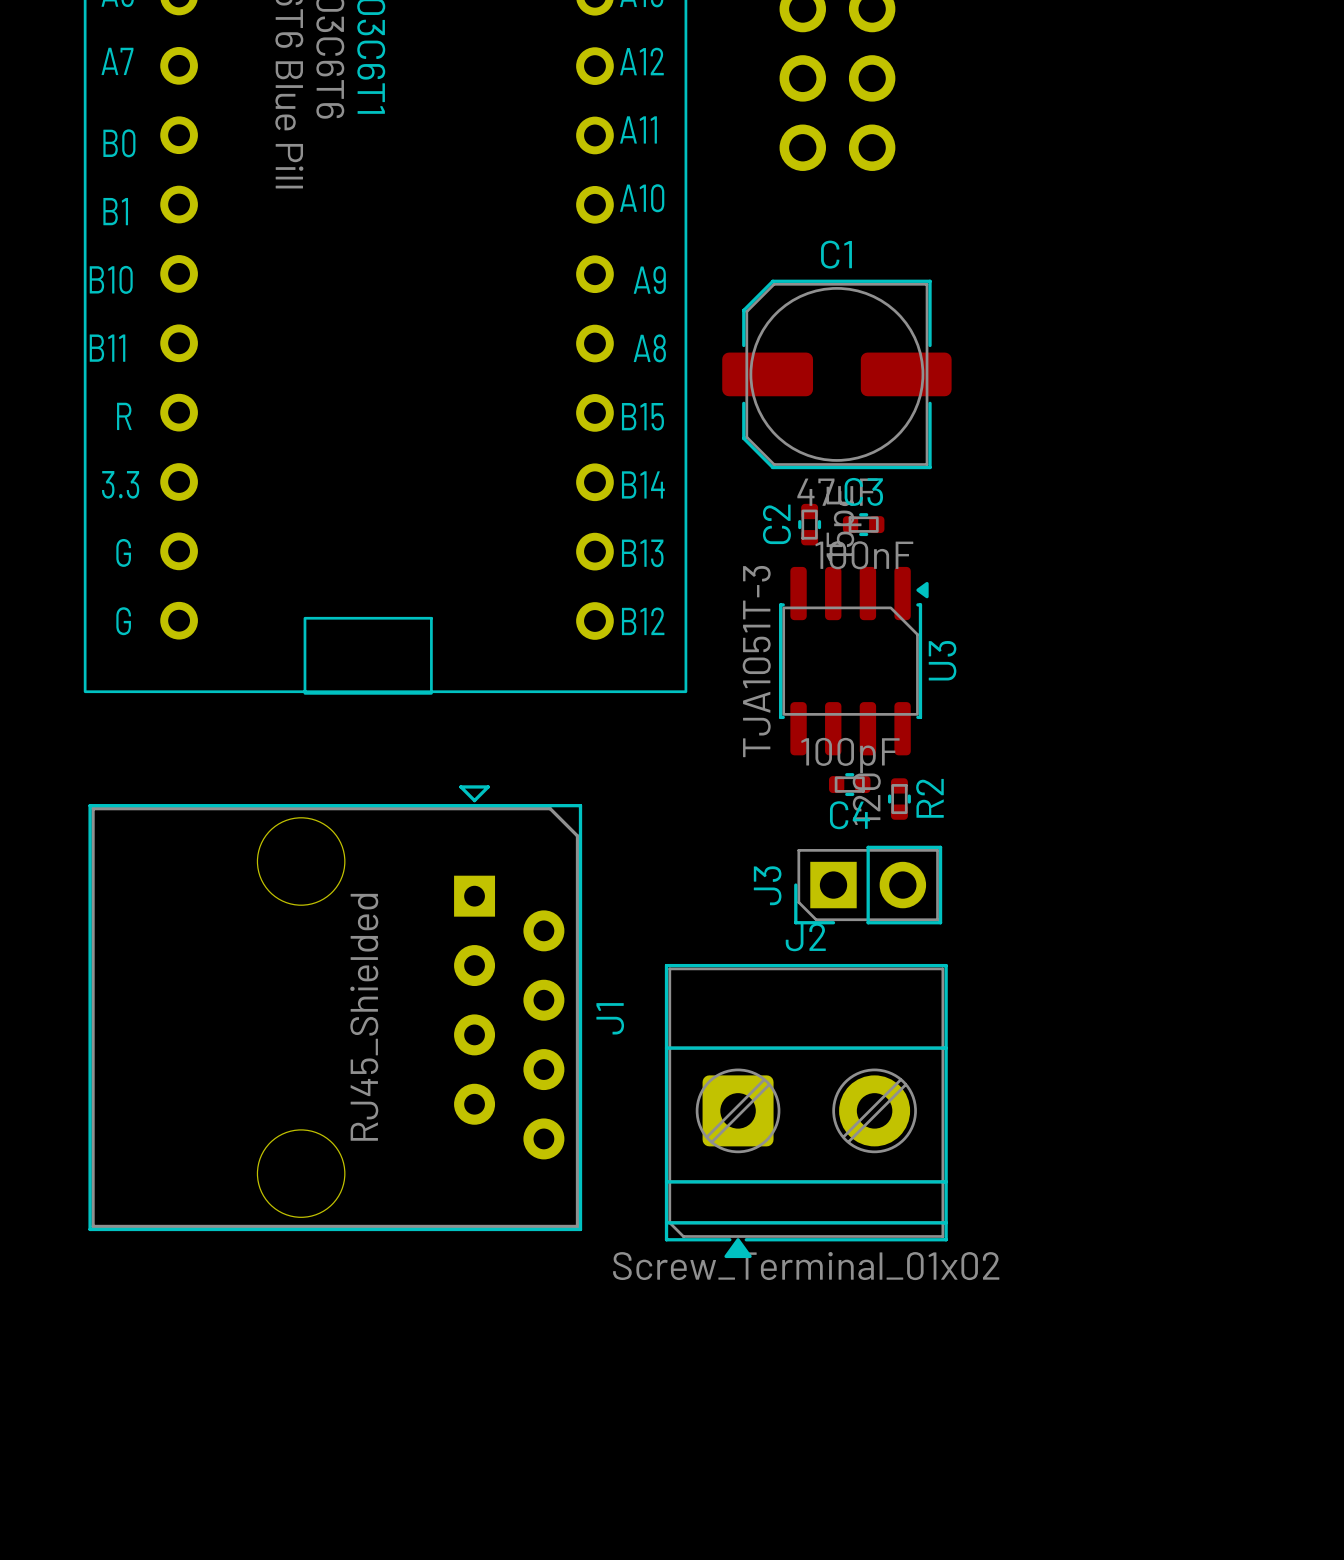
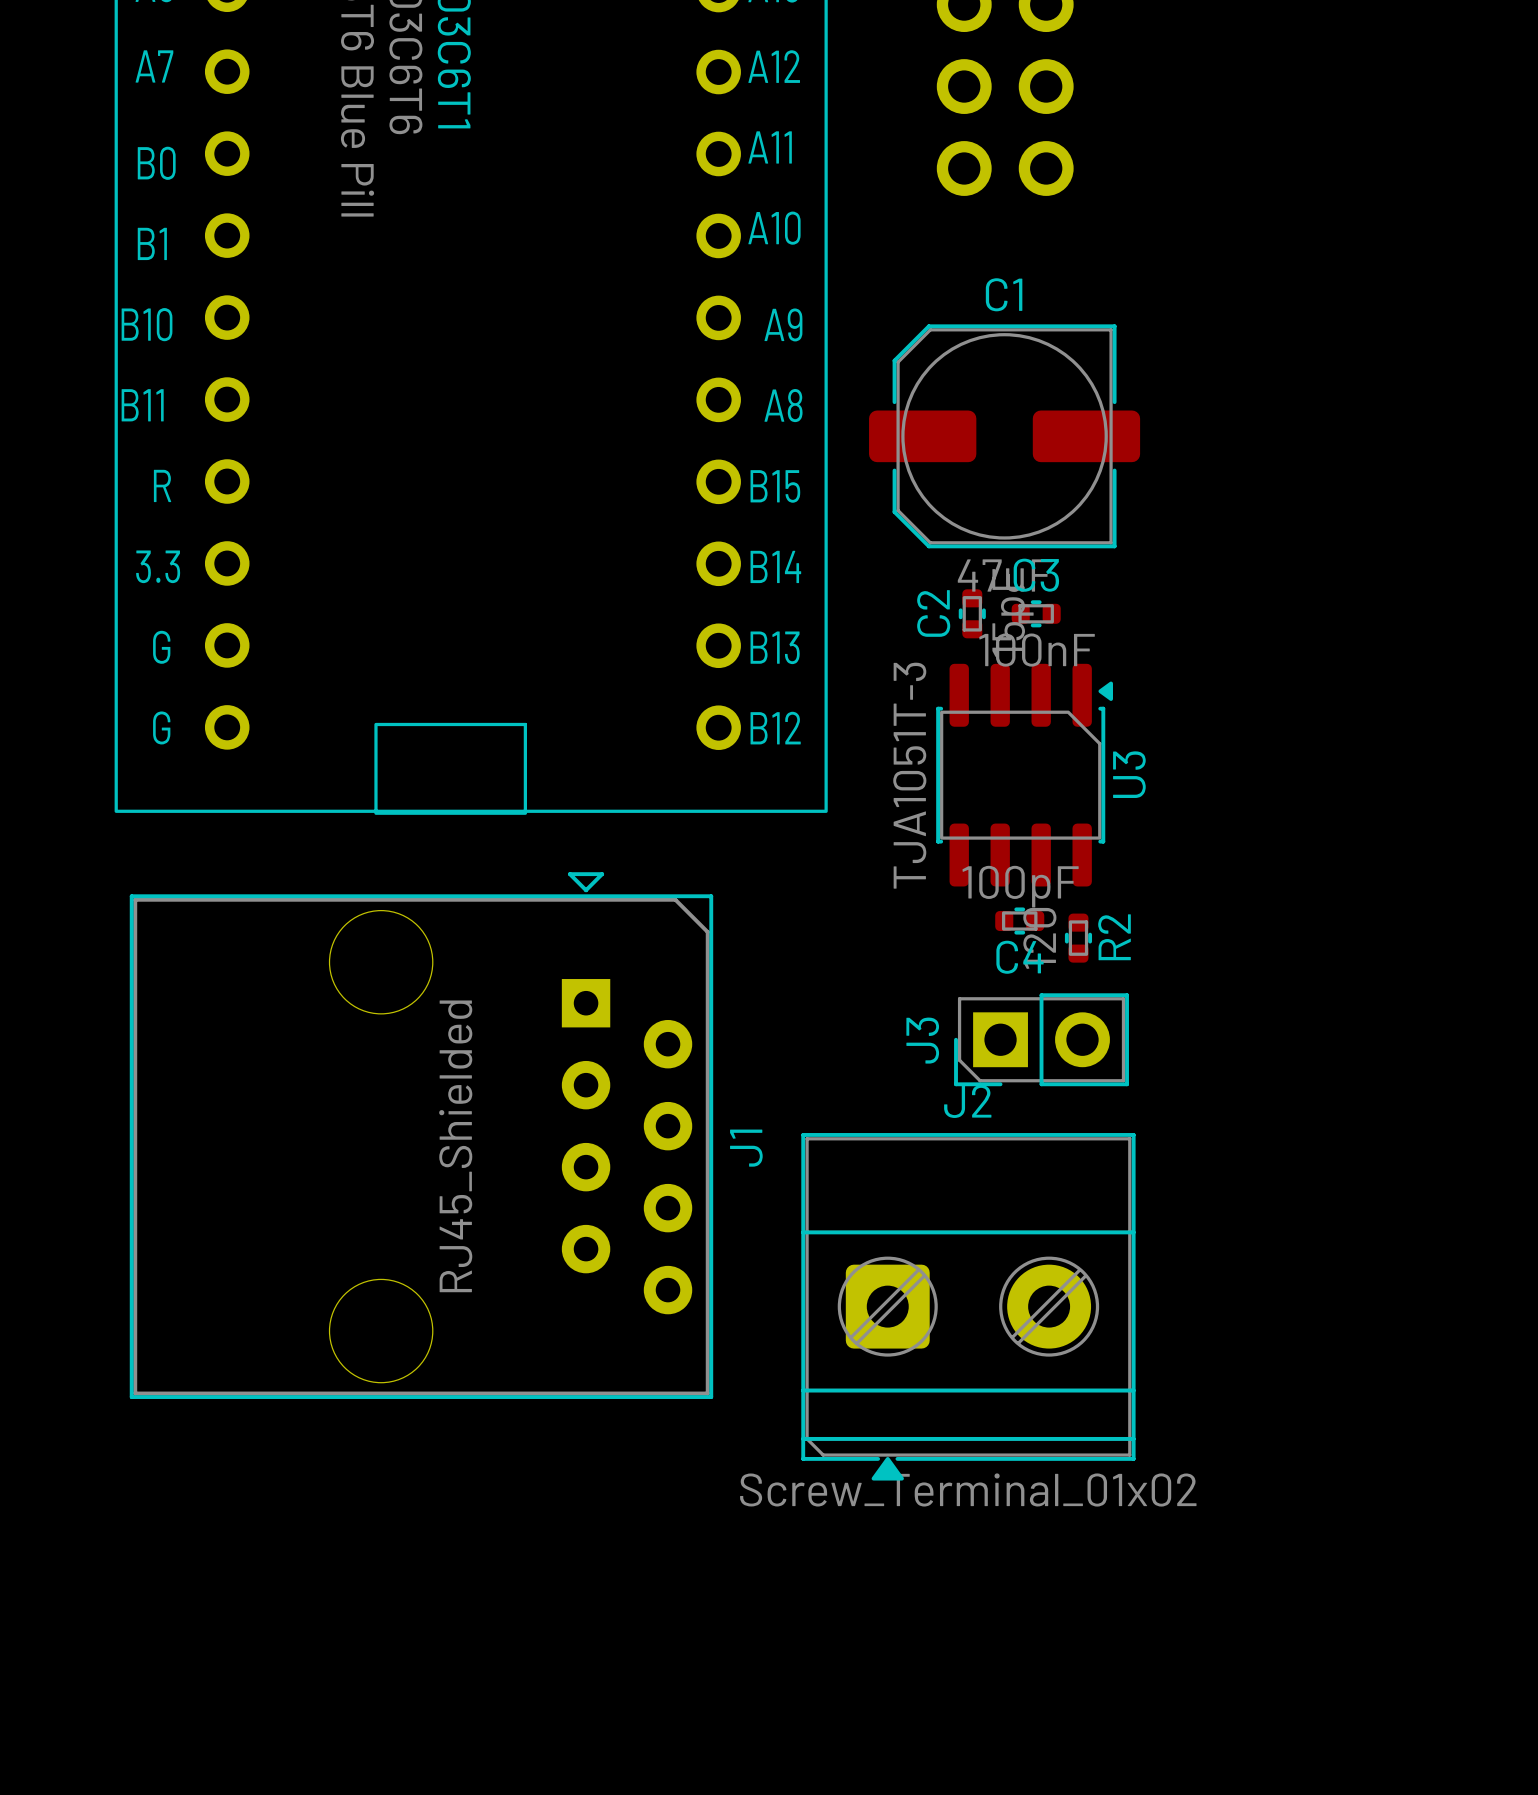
J1 position: (335, 1008) -> (421, 1135)

